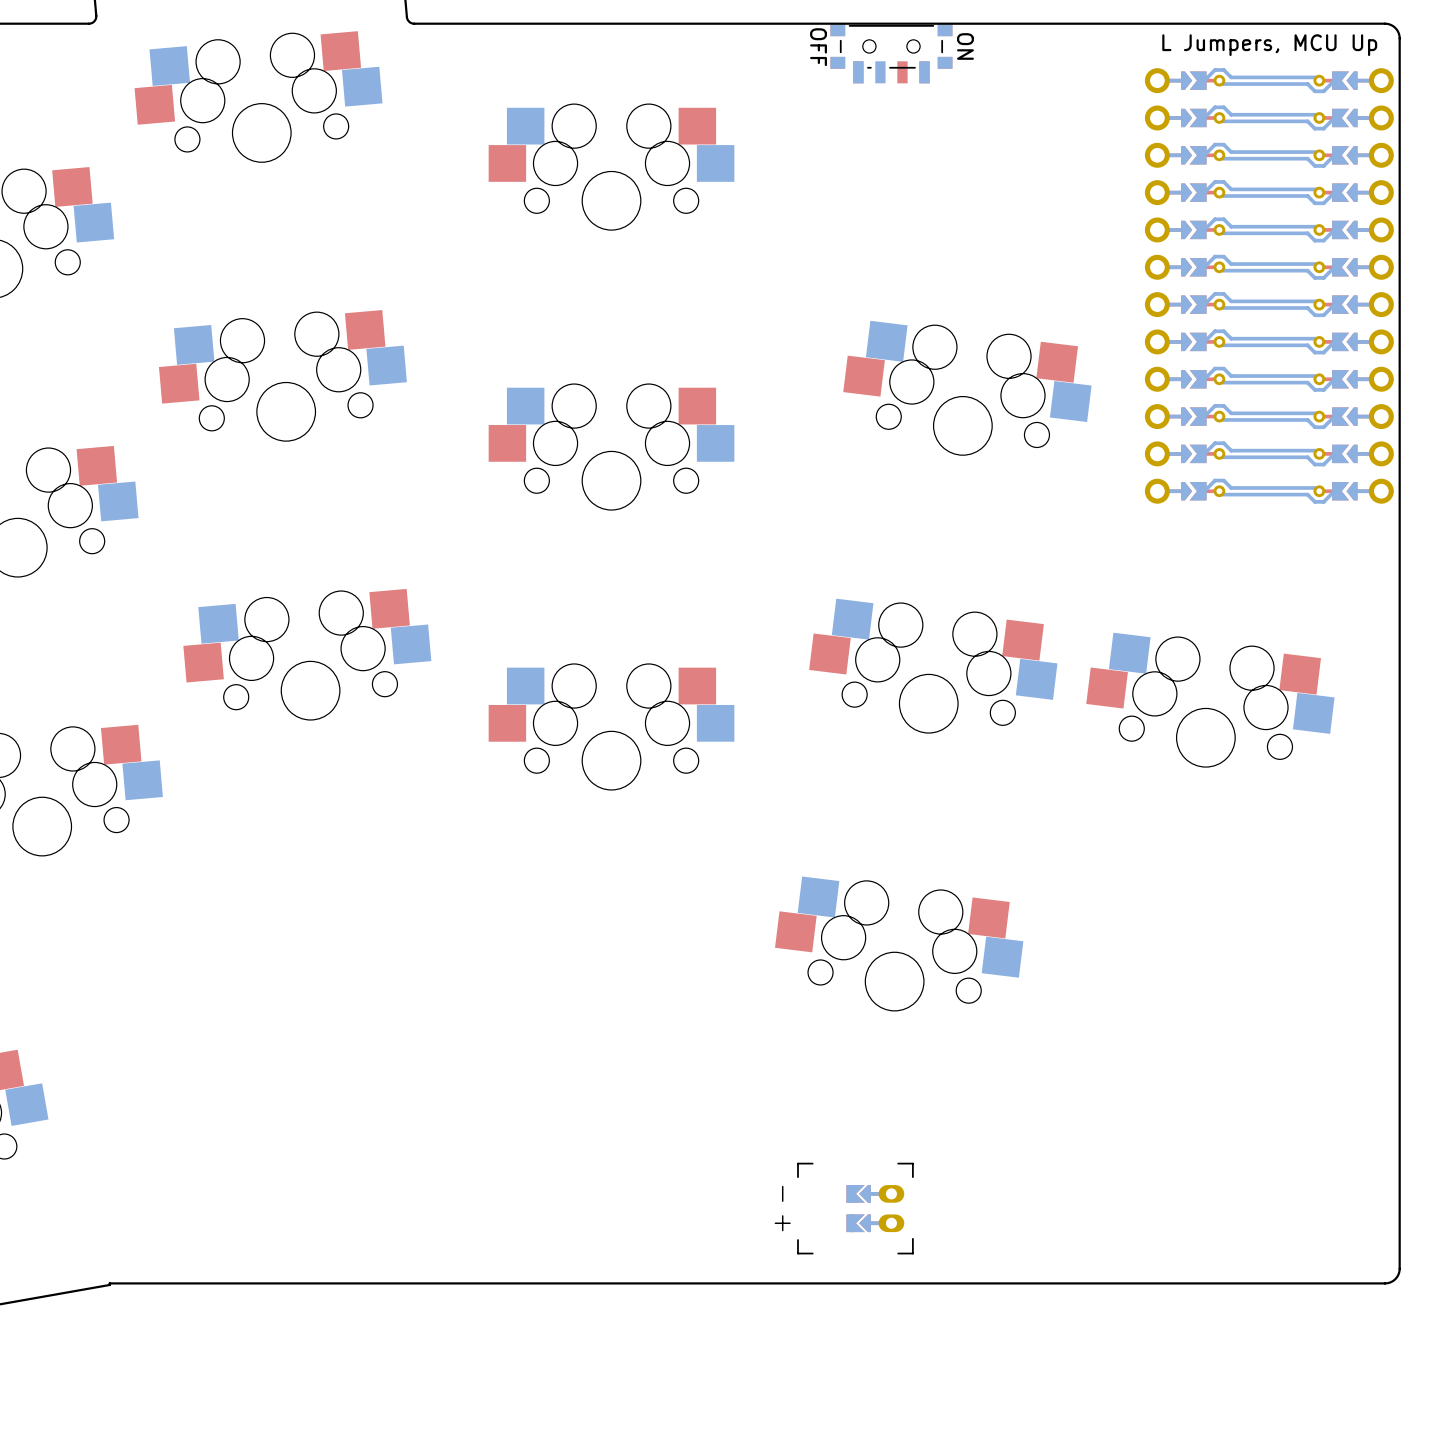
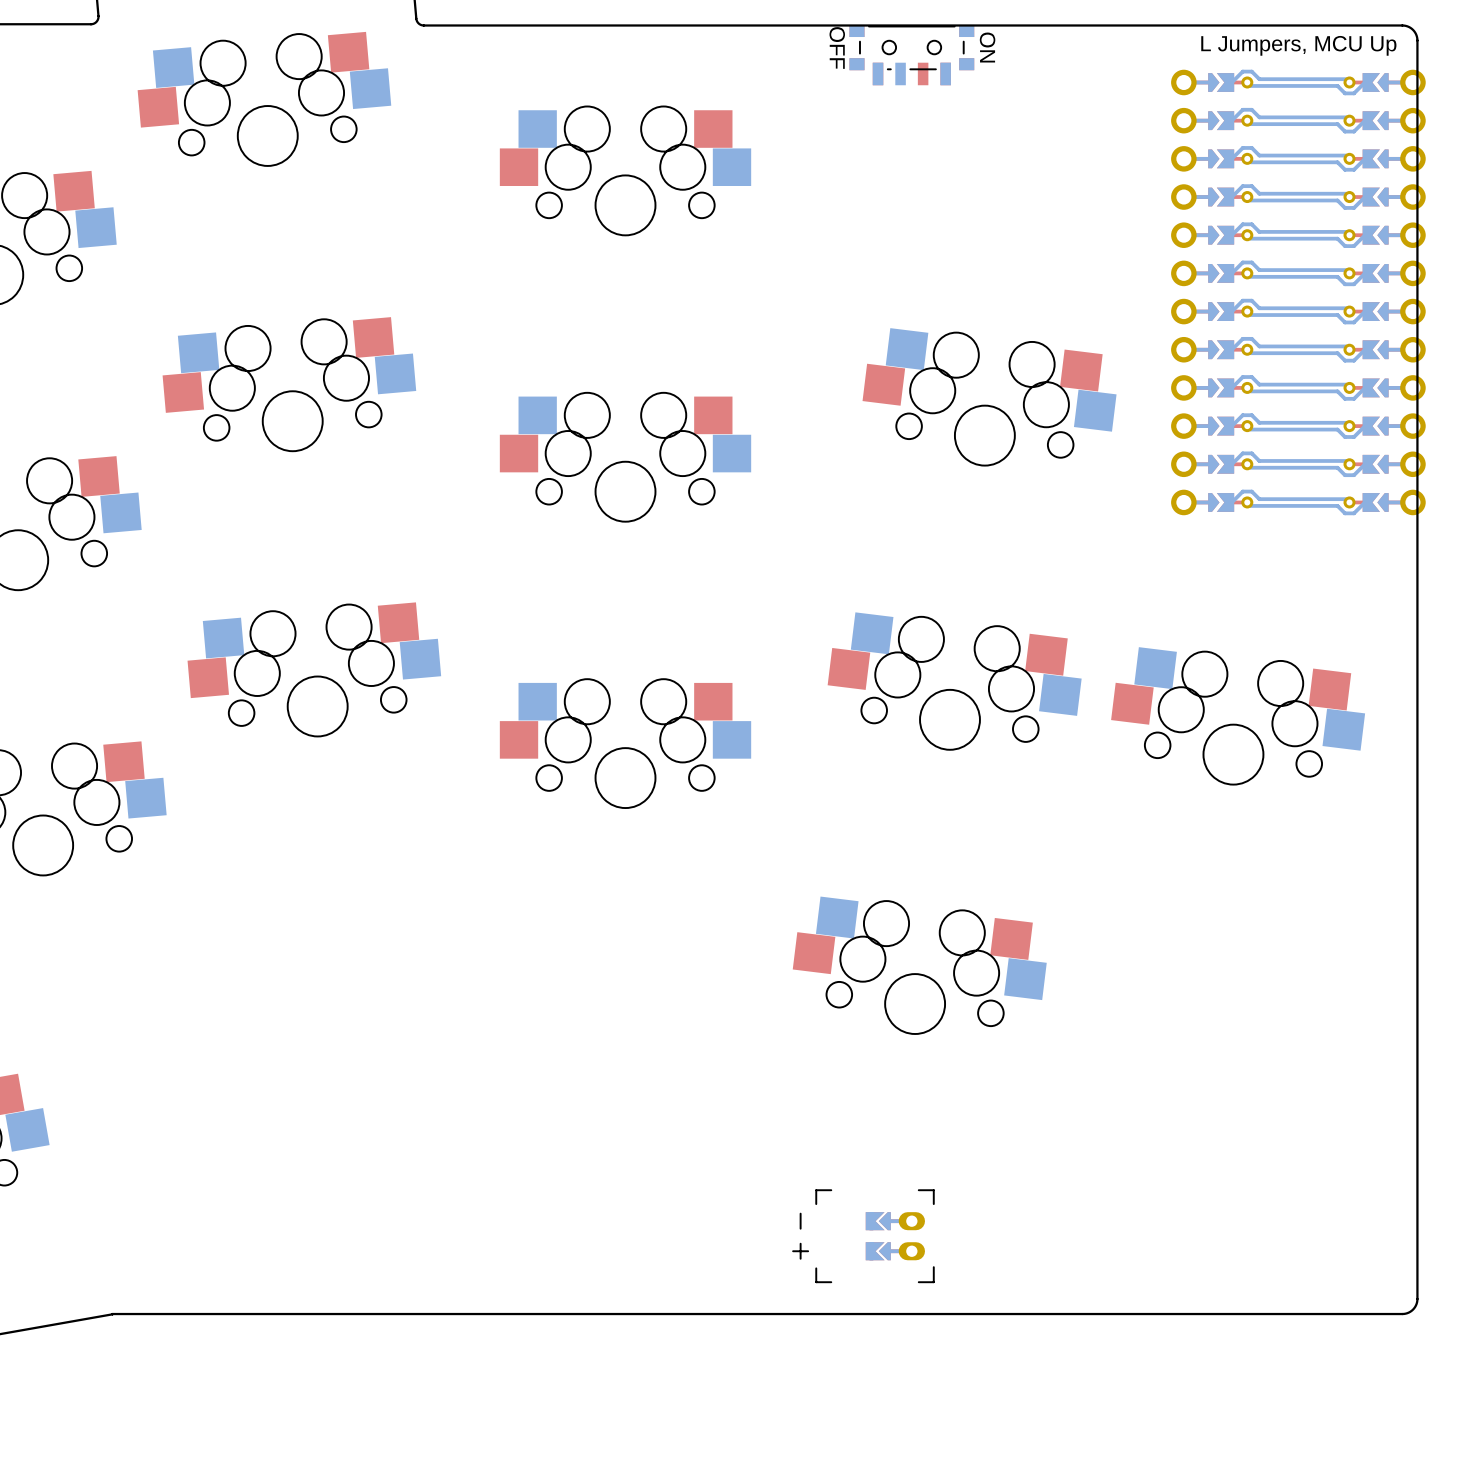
board edge: (406, 16) (409, 21) (414, 23) (1384, 23) (1396, 29) (1399, 38) (1399, 1271) (1394, 1280) (1384, 1283) (109, 1284) -> (416, 17) (418, 22) (423, 25) (1402, 25) (1414, 31) (1417, 40) (1417, 1302) (1411, 1310) (1402, 1314) (112, 1314)

